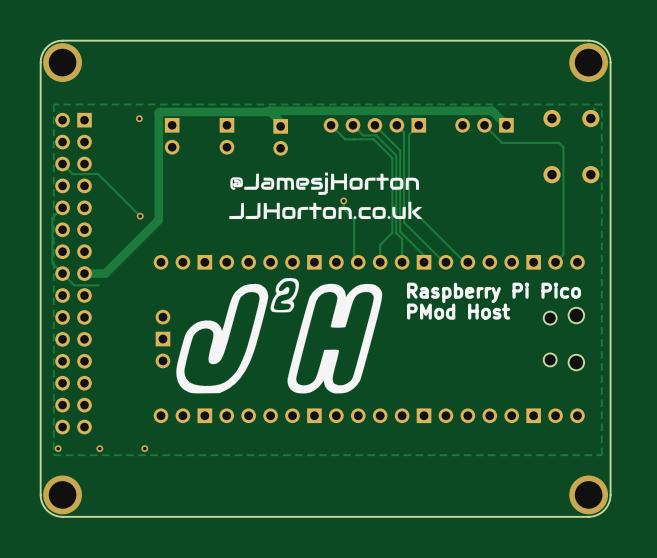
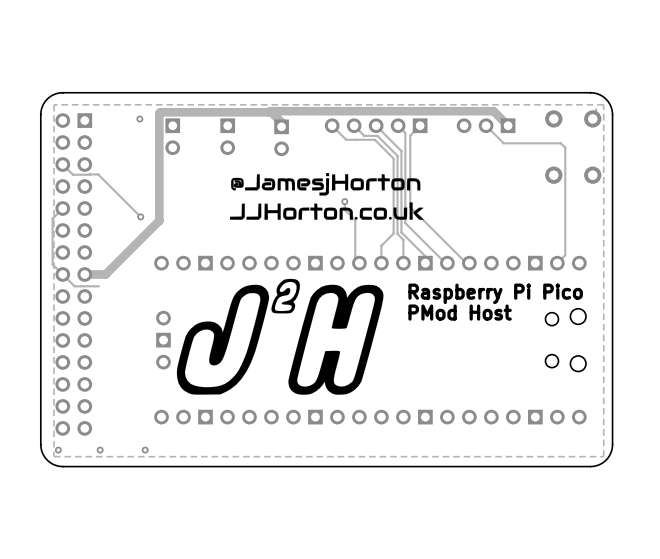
via: (62, 62) -> none
via: (588, 62) -> none
board edge: (610, 114) (609, 56) (601, 45) (588, 40) (59, 40) (47, 47) (41, 56) (40, 114) -> (612, 114) (610, 106) (606, 99) (598, 94) (590, 92) (62, 92) (54, 94) (47, 99) (42, 106) (40, 114)
board edge: (610, 443) (609, 500) (601, 512) (588, 516) (59, 516) (49, 512) (41, 500) (40, 443) -> (612, 444) (610, 453) (606, 460) (598, 464) (590, 466) (62, 466) (54, 464) (47, 460) (42, 453) (40, 444)
via: (62, 494) -> none
via: (588, 494) -> none

